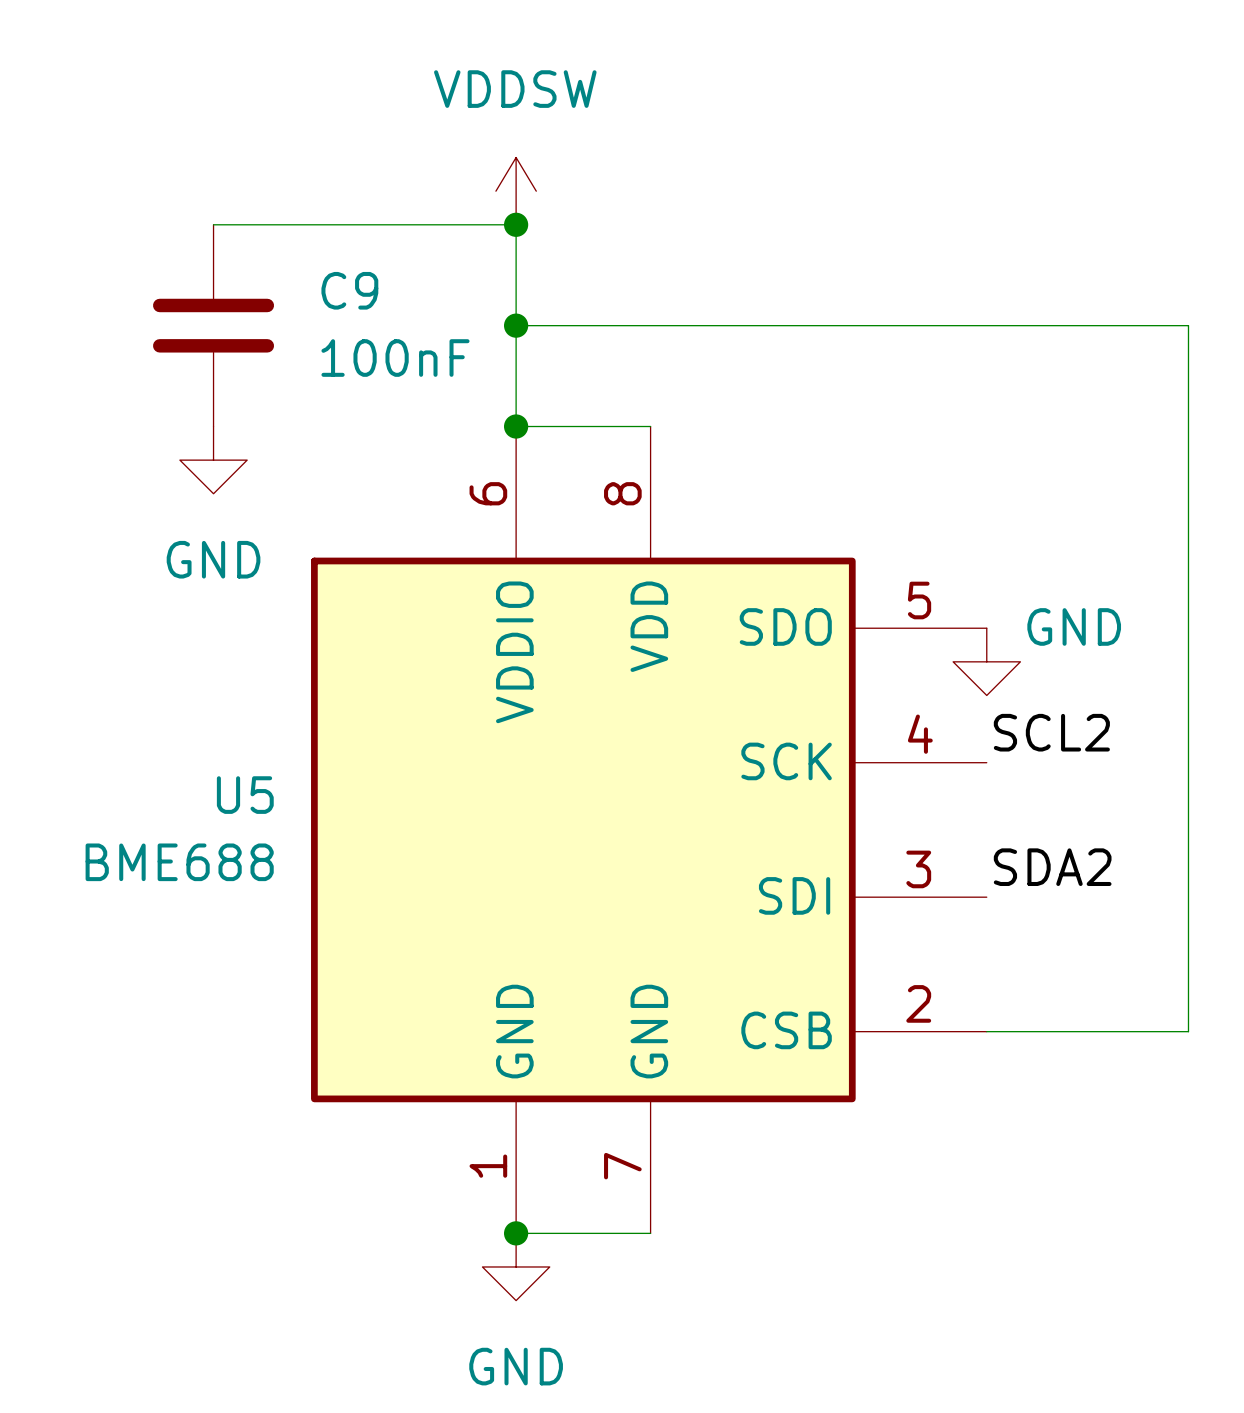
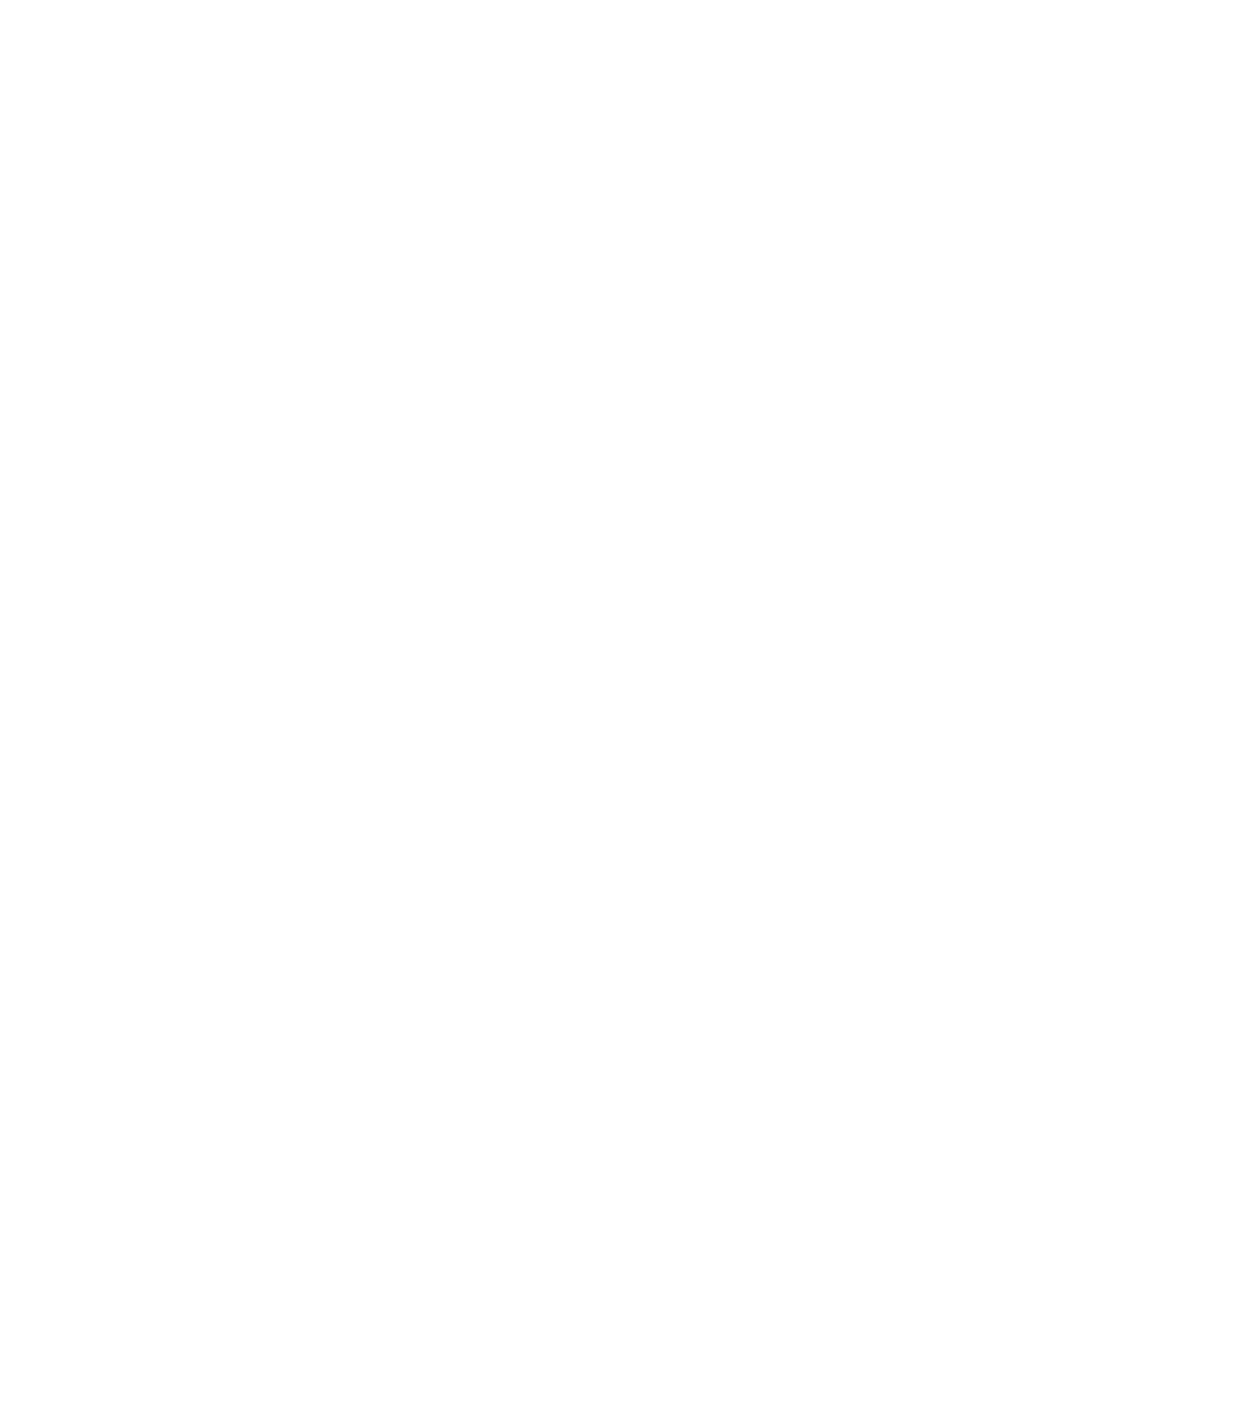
power symbol: VDDSW (516, 191) -> none
wire: (213, 224) (516, 224) (516, 426) (650, 426) -> none
junction: (516, 224) -> none
C9: 100nF (213, 325) -> none
wire: (516, 325) (1188, 325) (1188, 1031) (986, 1031) -> none
junction: (516, 325) -> none
junction: (516, 426) -> none
power symbol: GND (213, 460) -> none
power symbol: GND (986, 661) -> none
label: SCL2 (1051, 732) -> none
U5: BME688 (648, 829) -> none
label: SDA2 (1052, 867) -> none
wire: (516, 1233) (650, 1233) -> none
junction: (516, 1233) -> none
power symbol: GND (516, 1266) -> none

